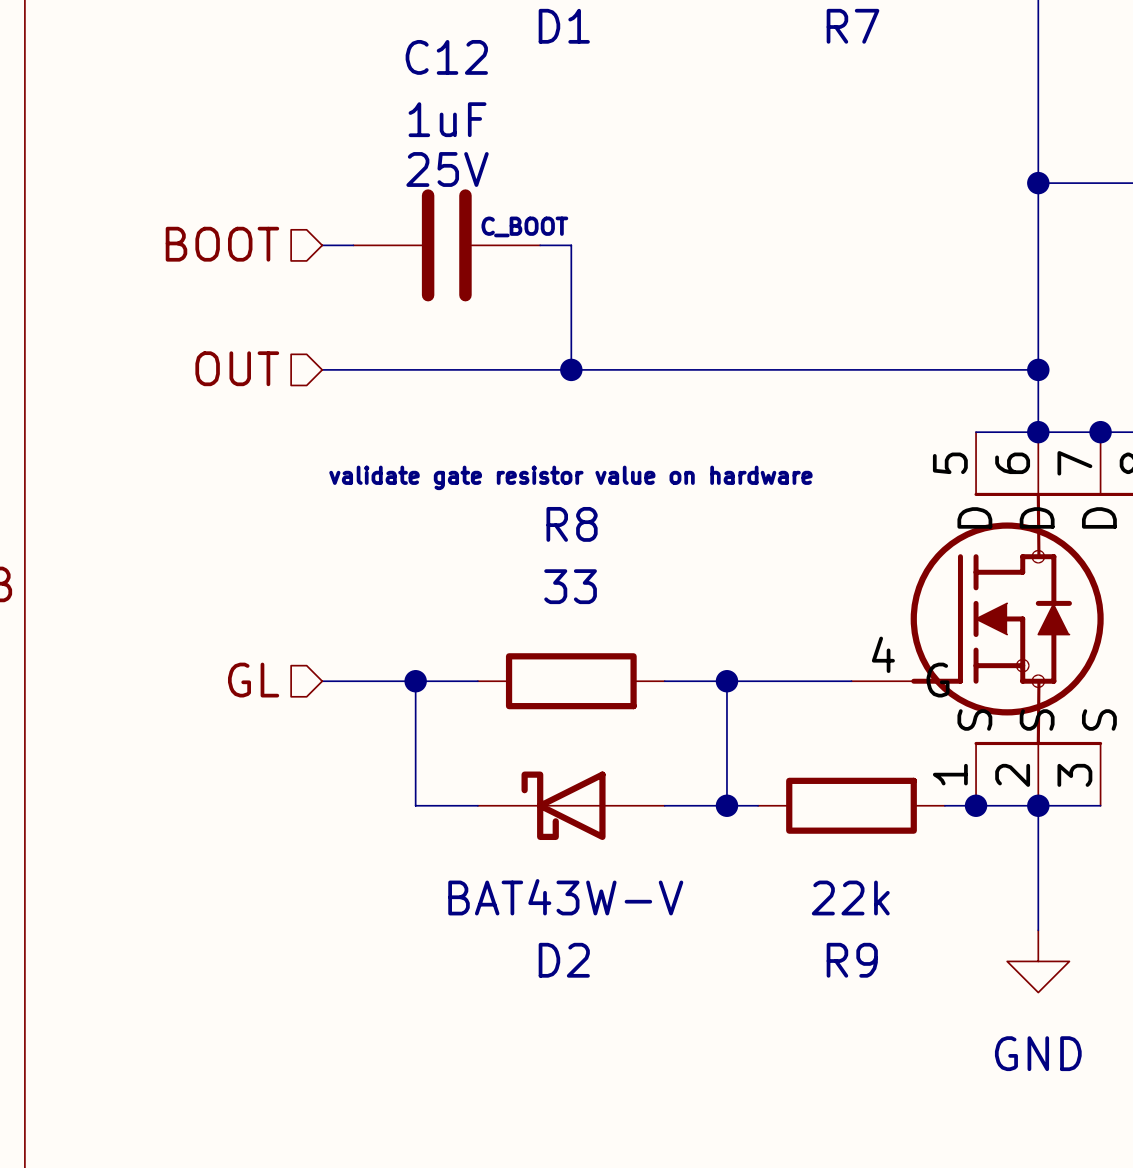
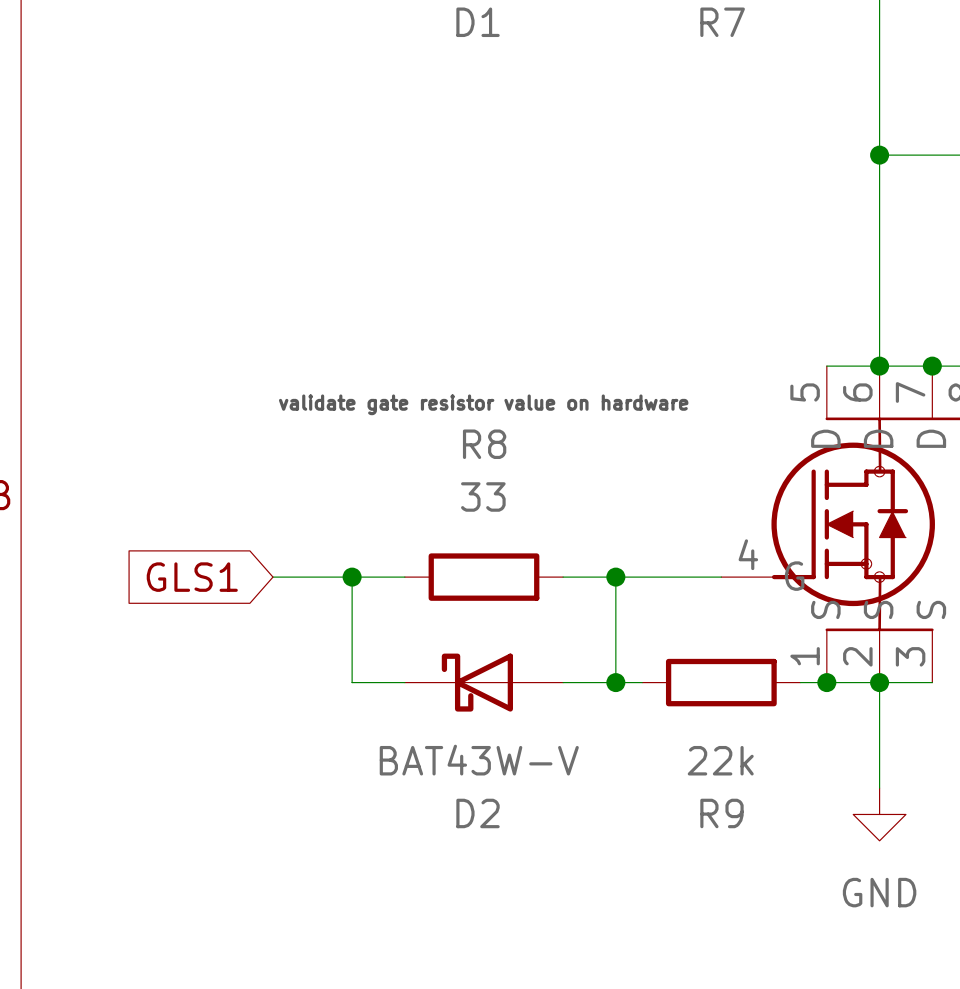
text: C_BOOT (524, 226) -> none
hierarchical label: BOOT (222, 244) -> none
wire: (322, 245) (353, 245) -> none
C12: 1uF (446, 245) -> none
wire: (540, 245) (571, 245) (571, 369) -> none
hierarchical label: OUT (237, 368) -> none
wire: (322, 369) (1038, 369) -> none
junction: (571, 369) -> none
junction: (1038, 369) -> none
hierarchical label: GL (253, 680) -> none
global label: none -> GLS1 (192, 577)

